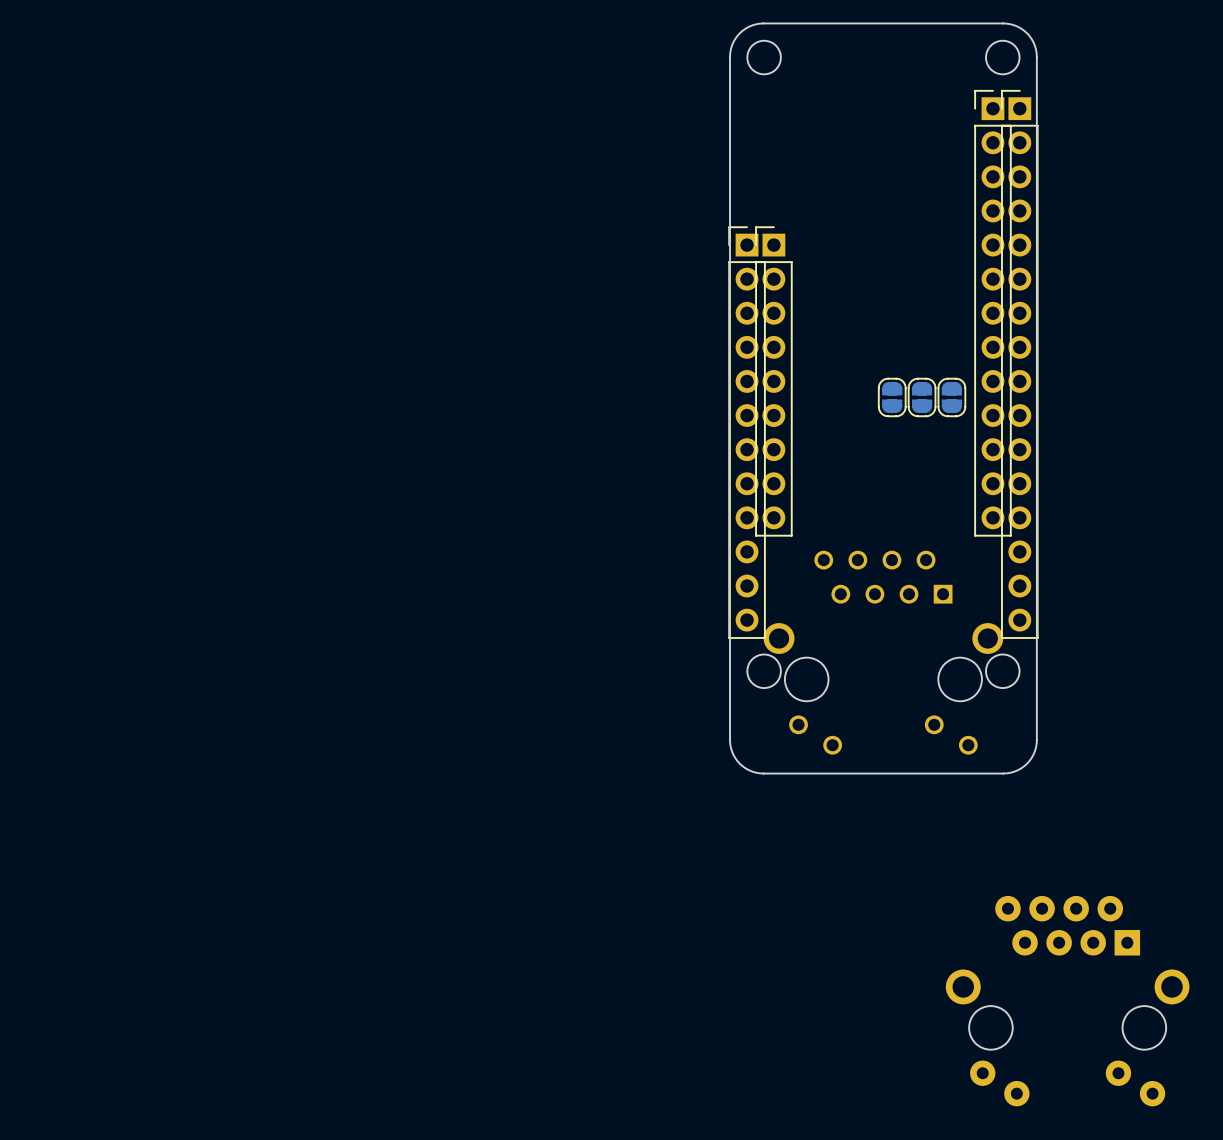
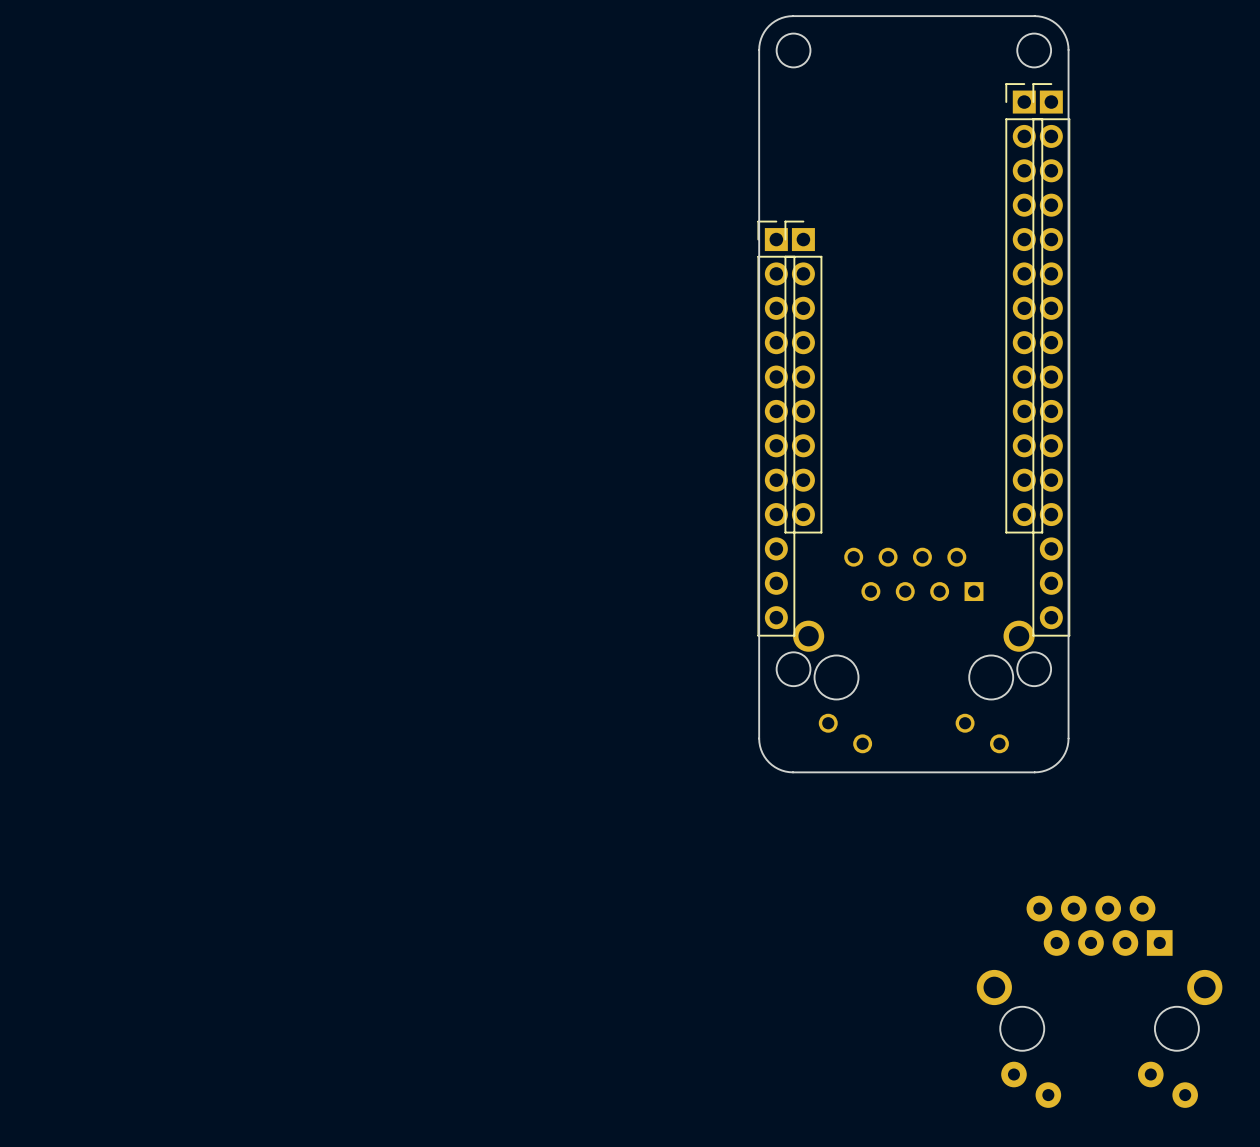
part: (892, 397) -> none
part: (922, 397) -> none
part: (951, 397) -> none

